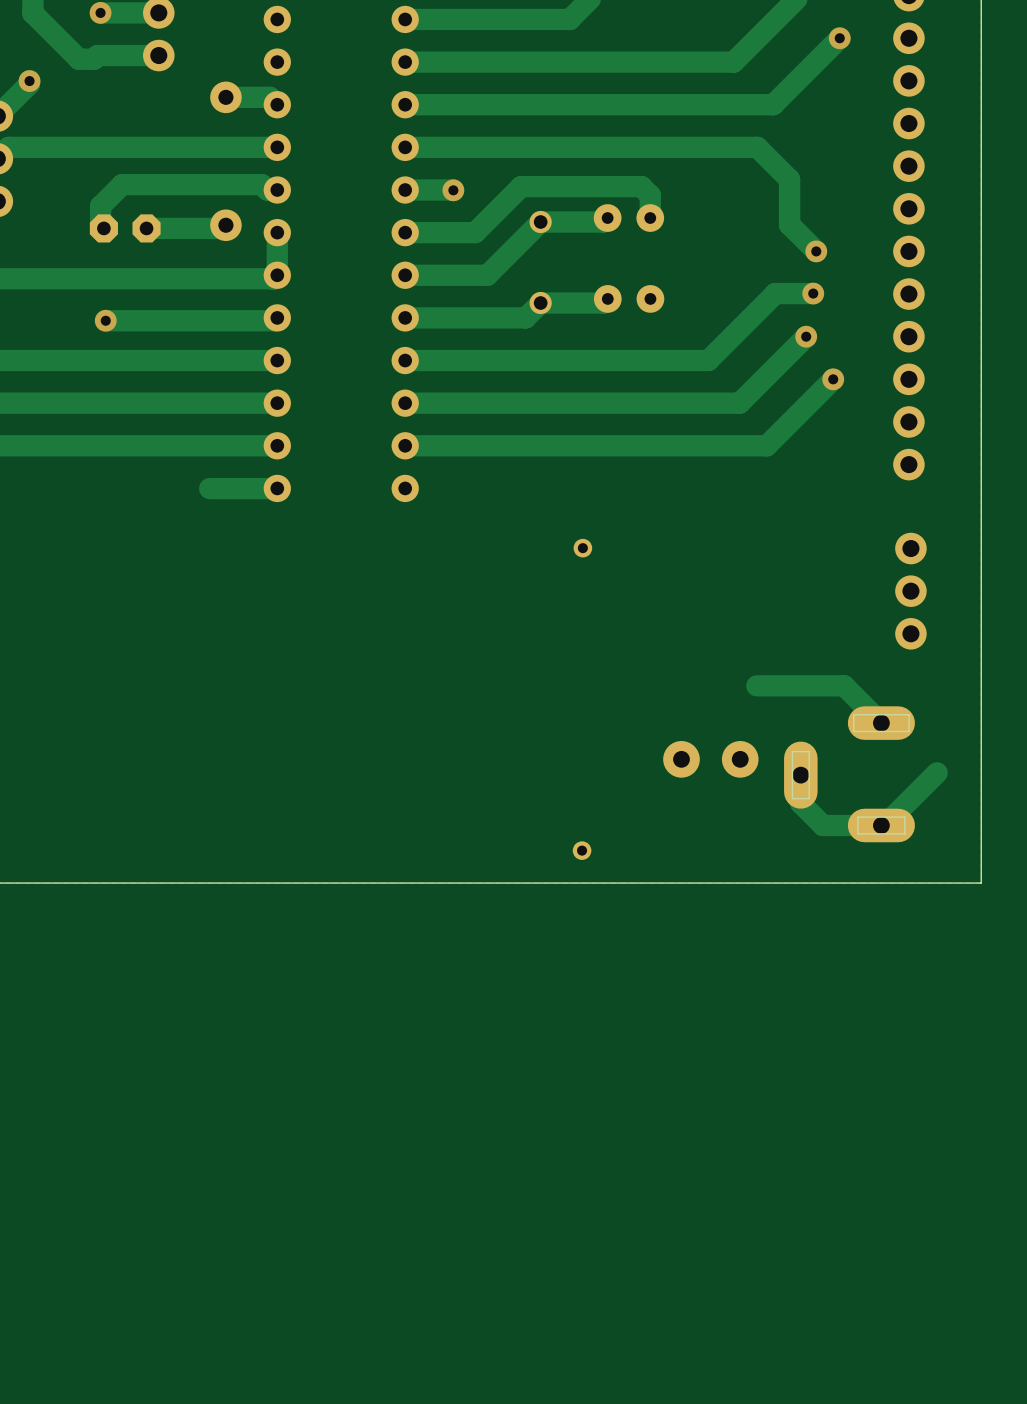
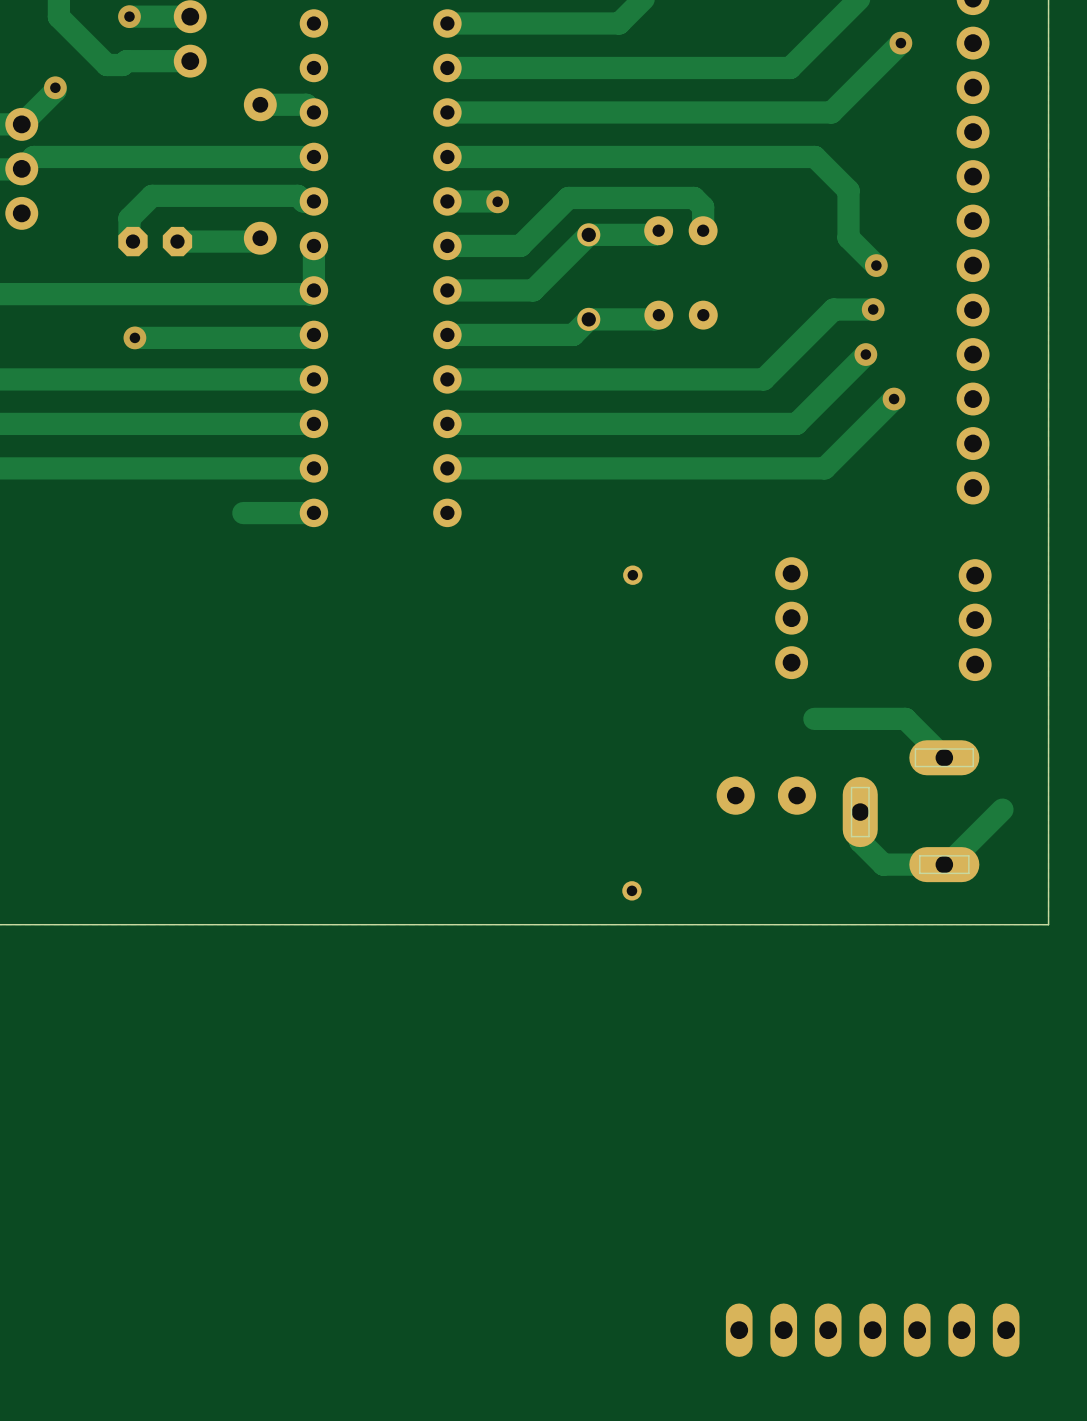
part: none -> (791, 618)
part: none -> (872, 1330)

